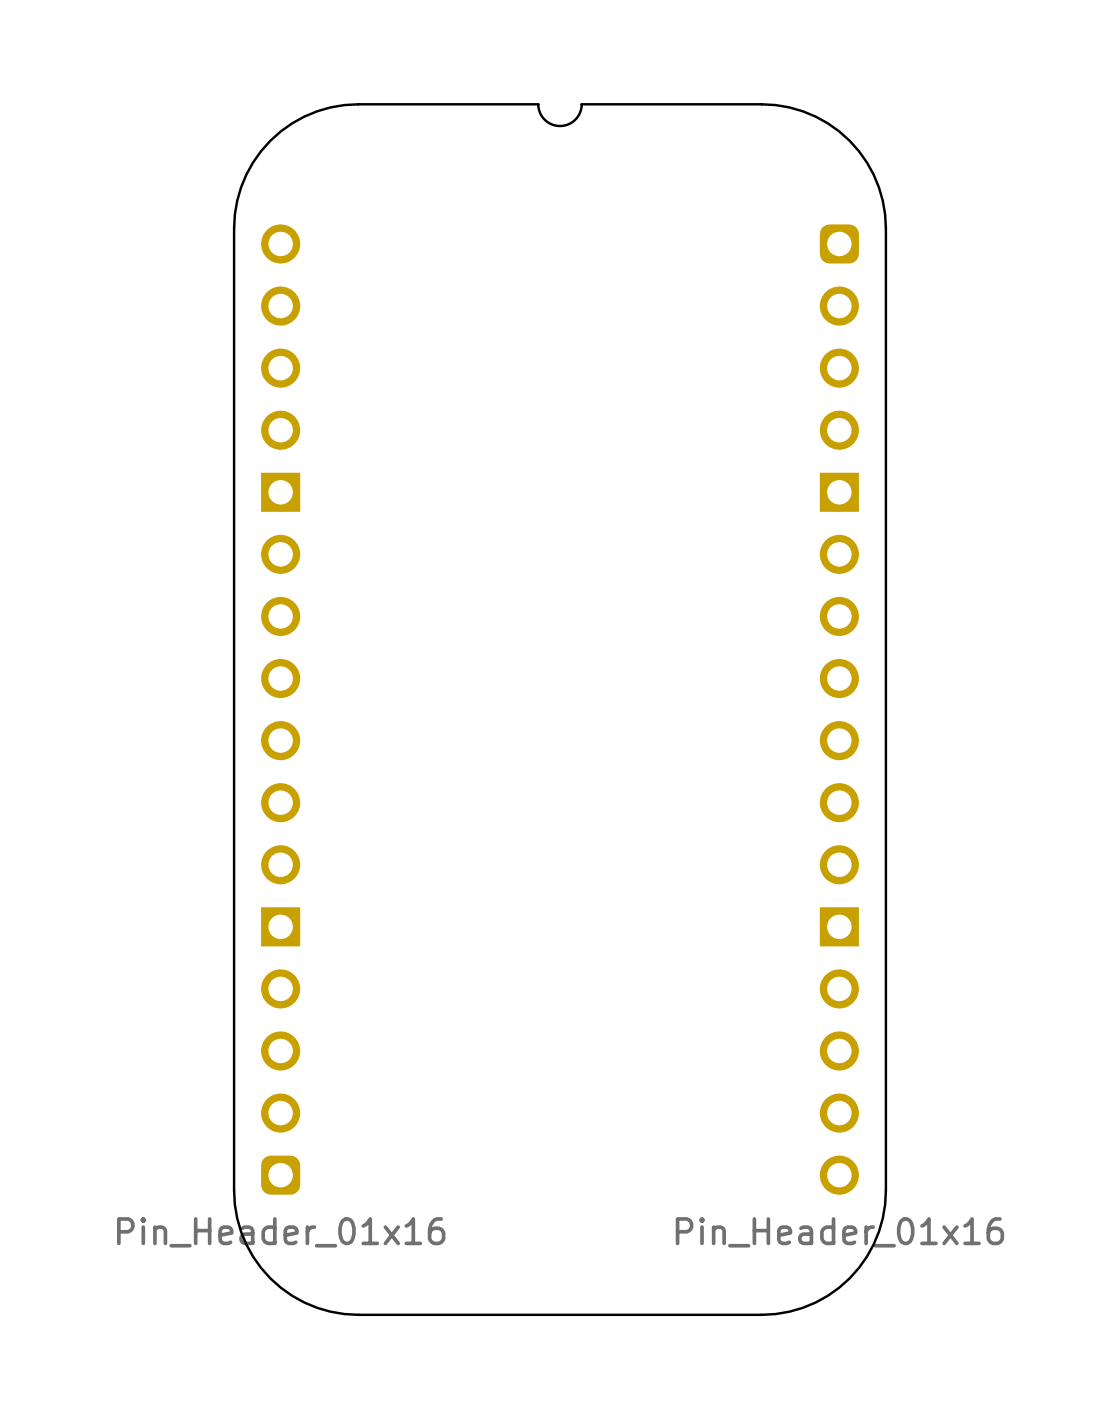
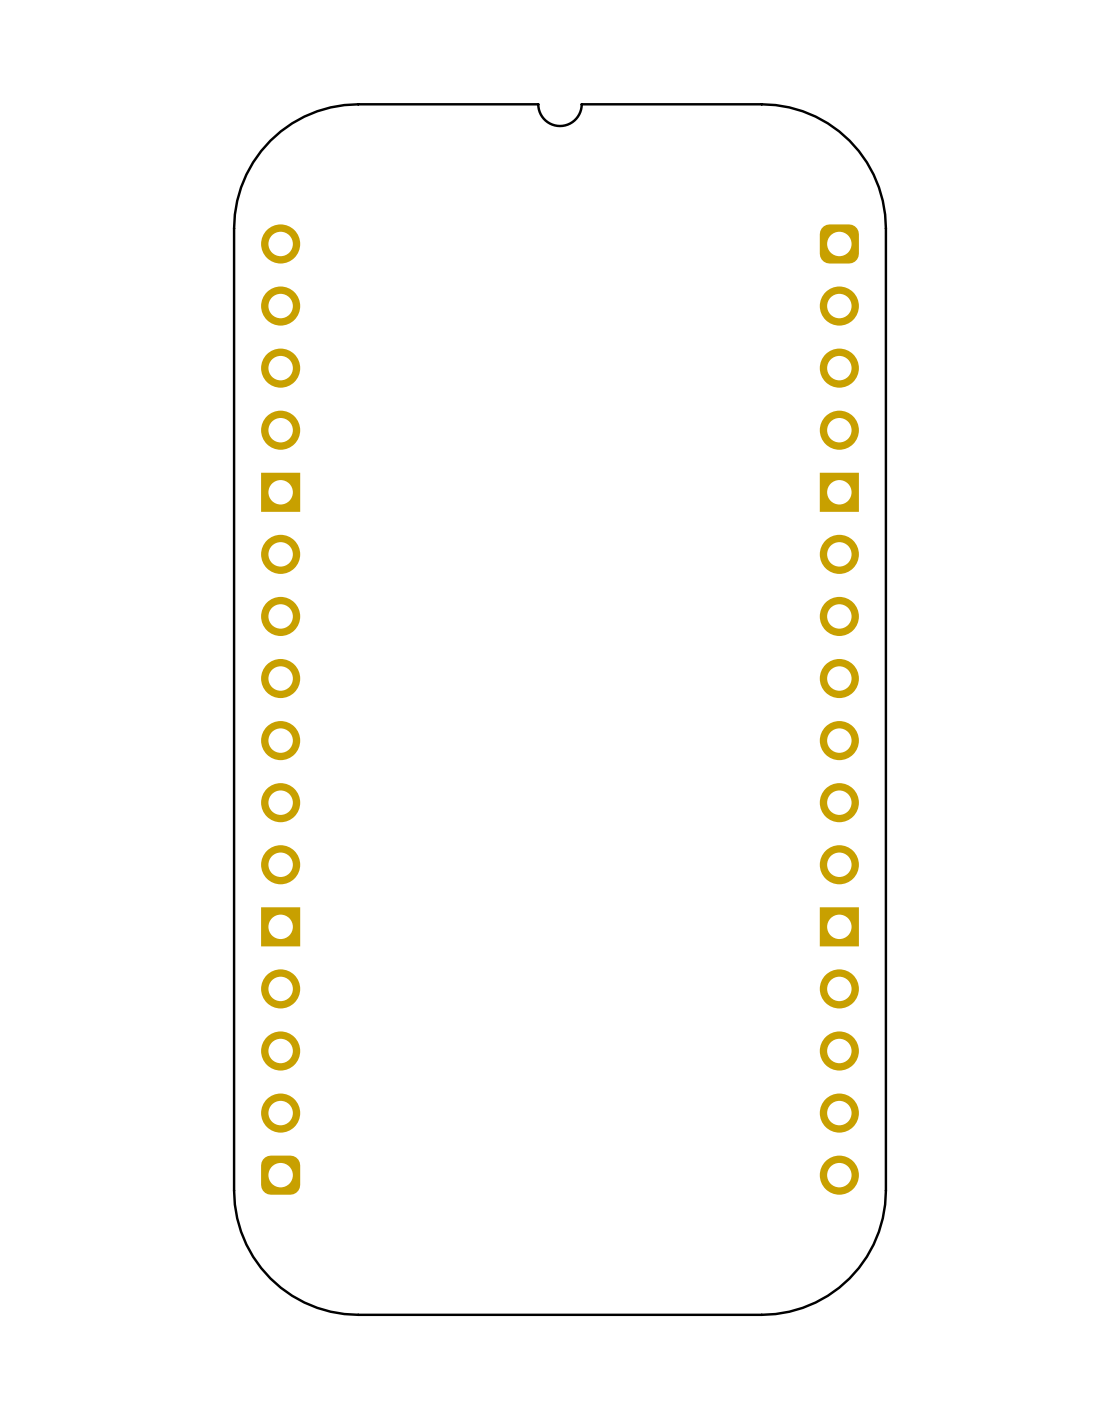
drawing: [117, 1217, 446, 1248] -> none
drawing: [675, 1217, 1005, 1248] -> none

